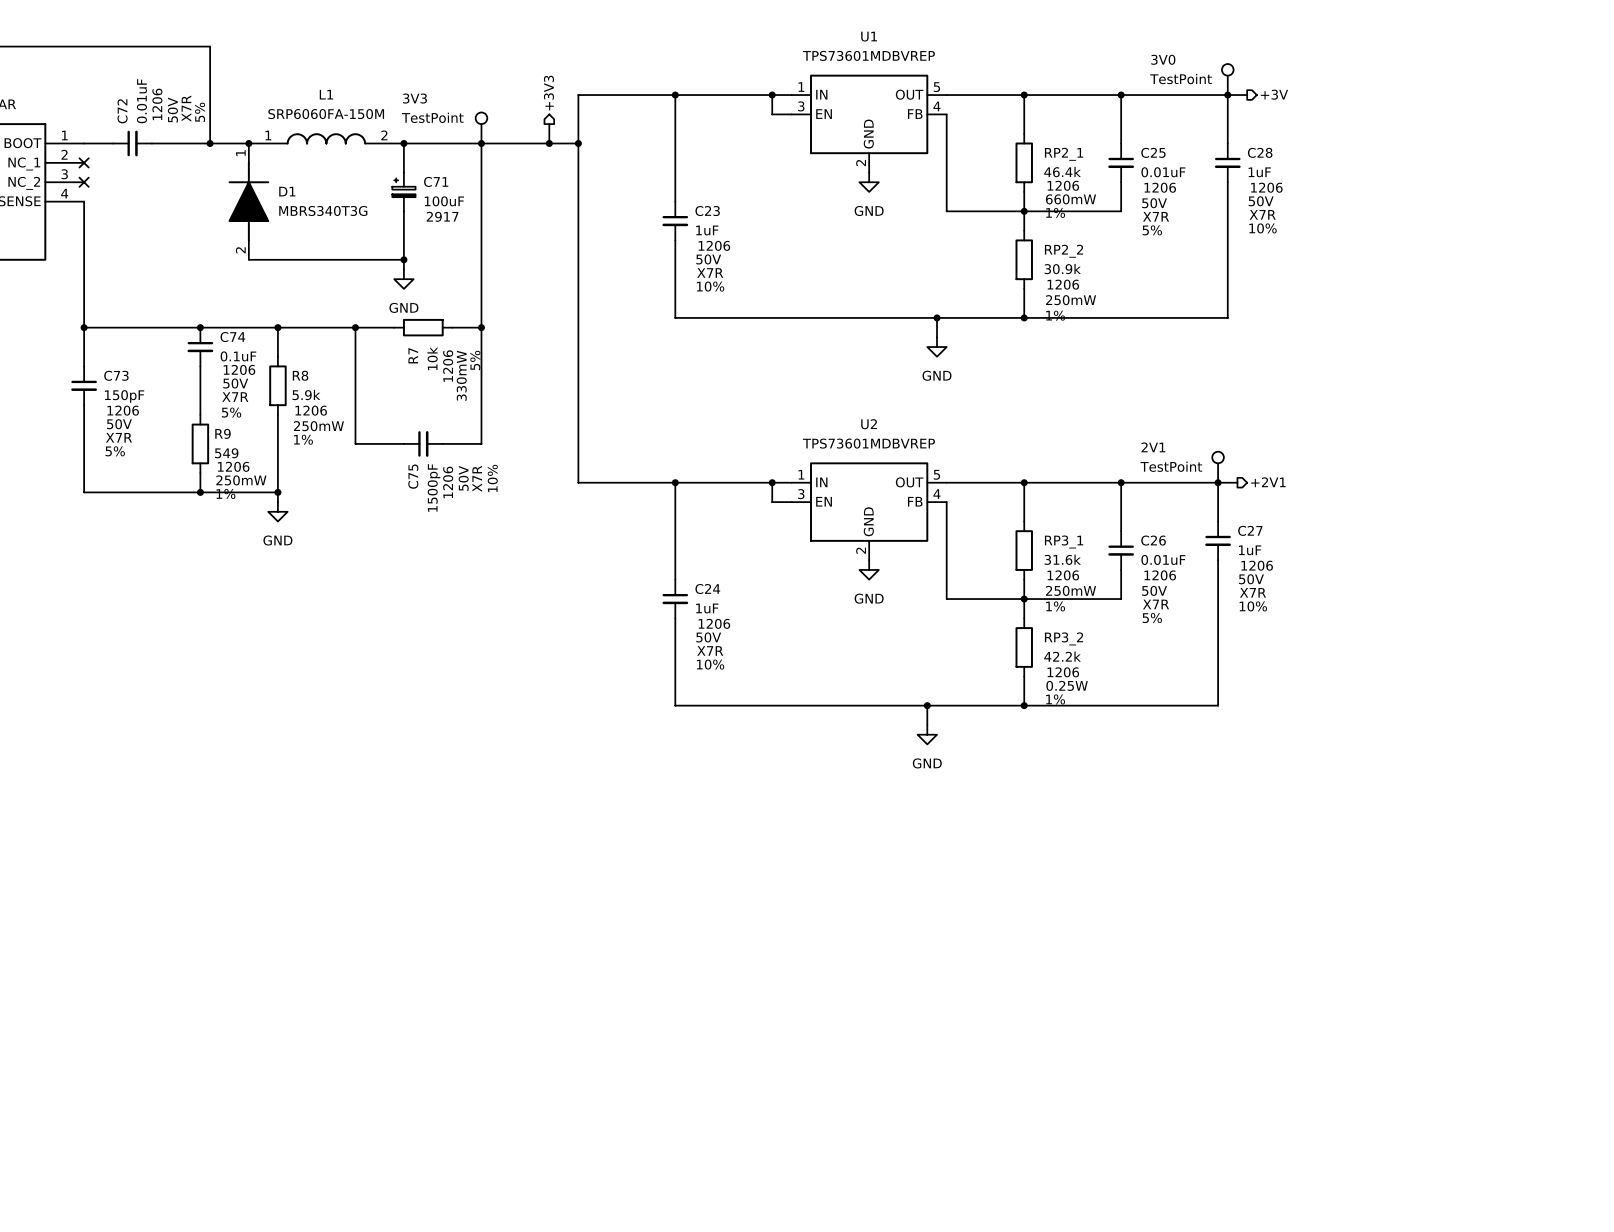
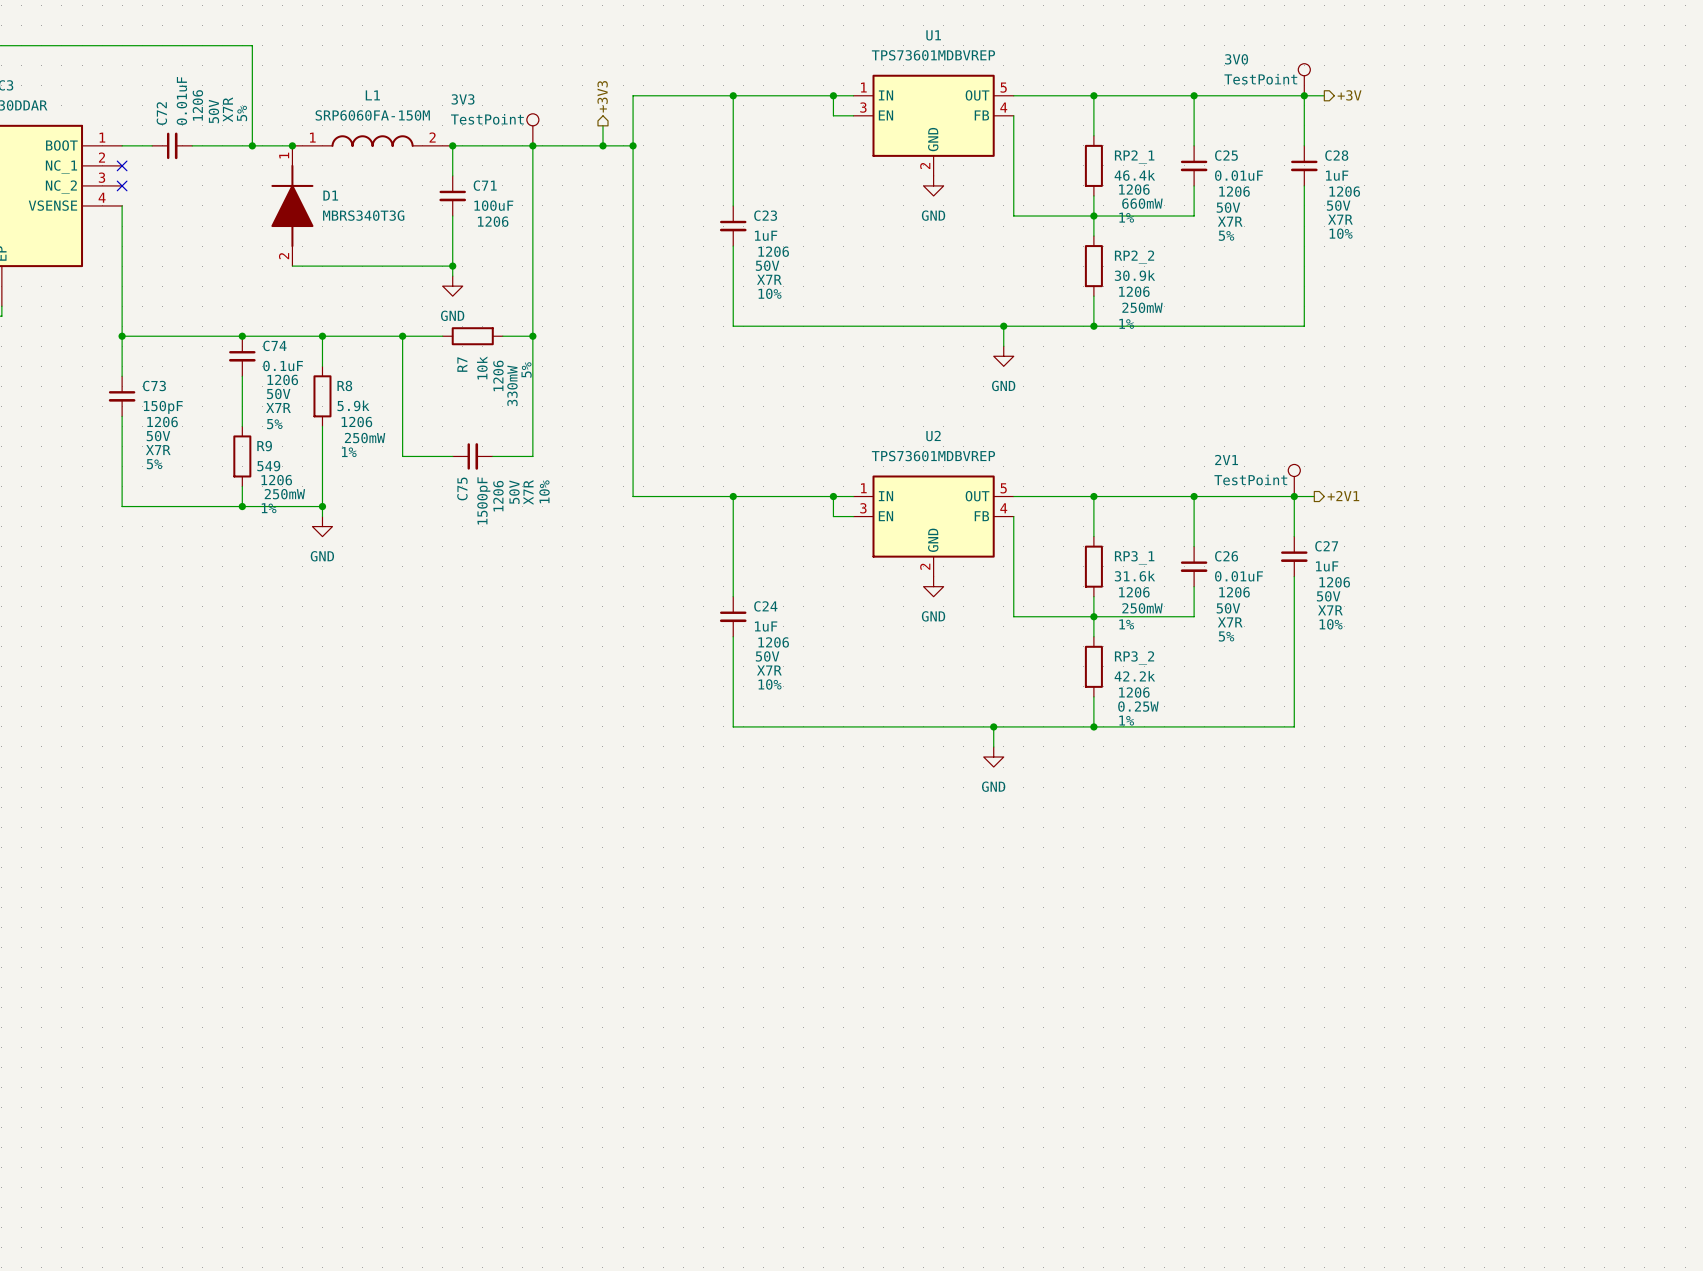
C71 symbol: [392, 172, 416, 212] -> [439, 175, 467, 217]
C71 text: 2917 (442, 216) -> 1206 (493, 221)

